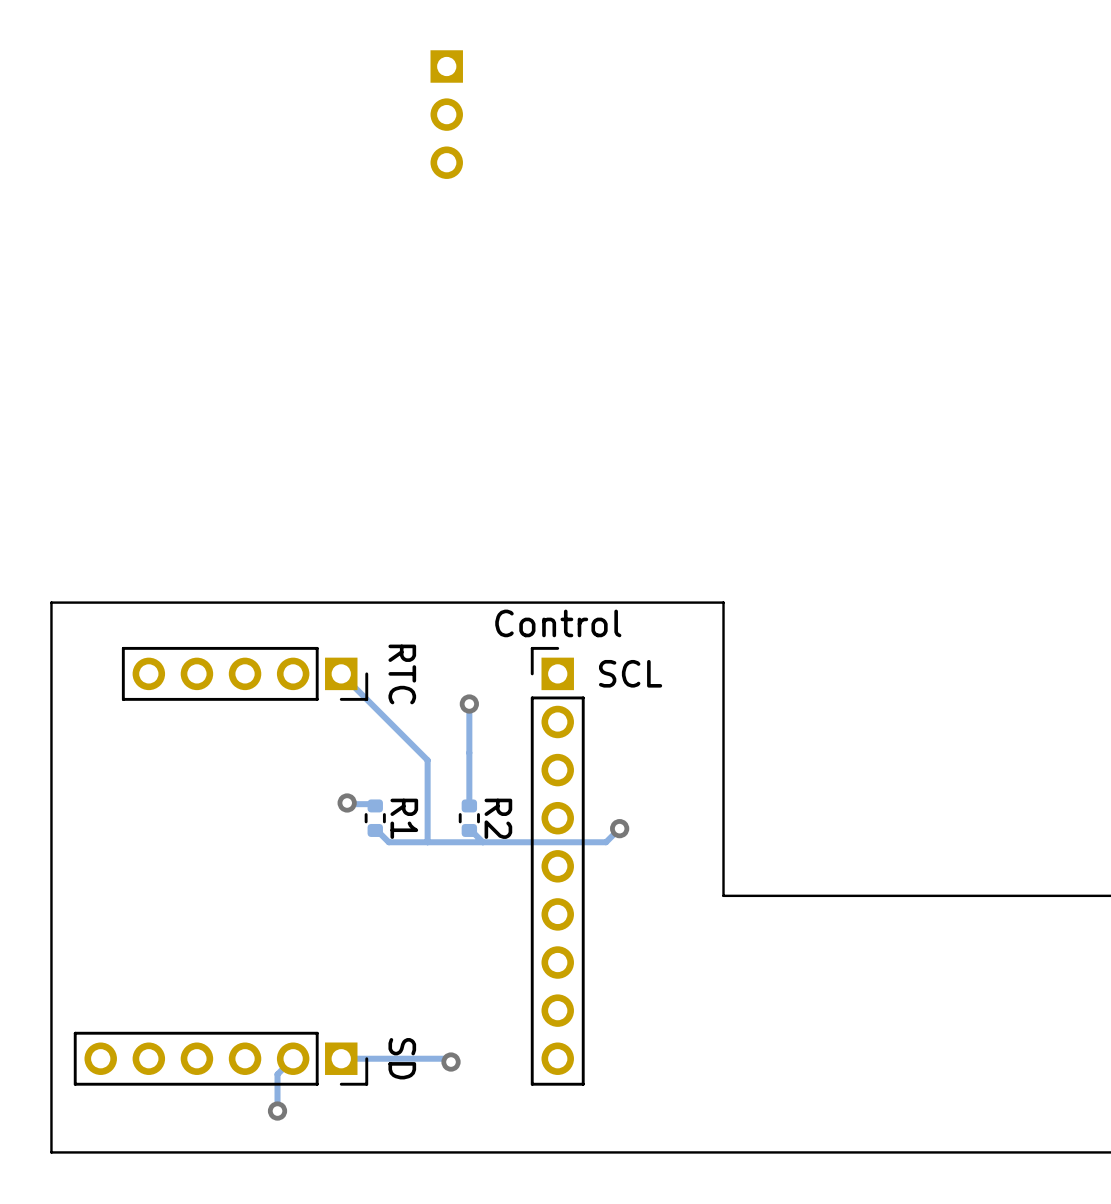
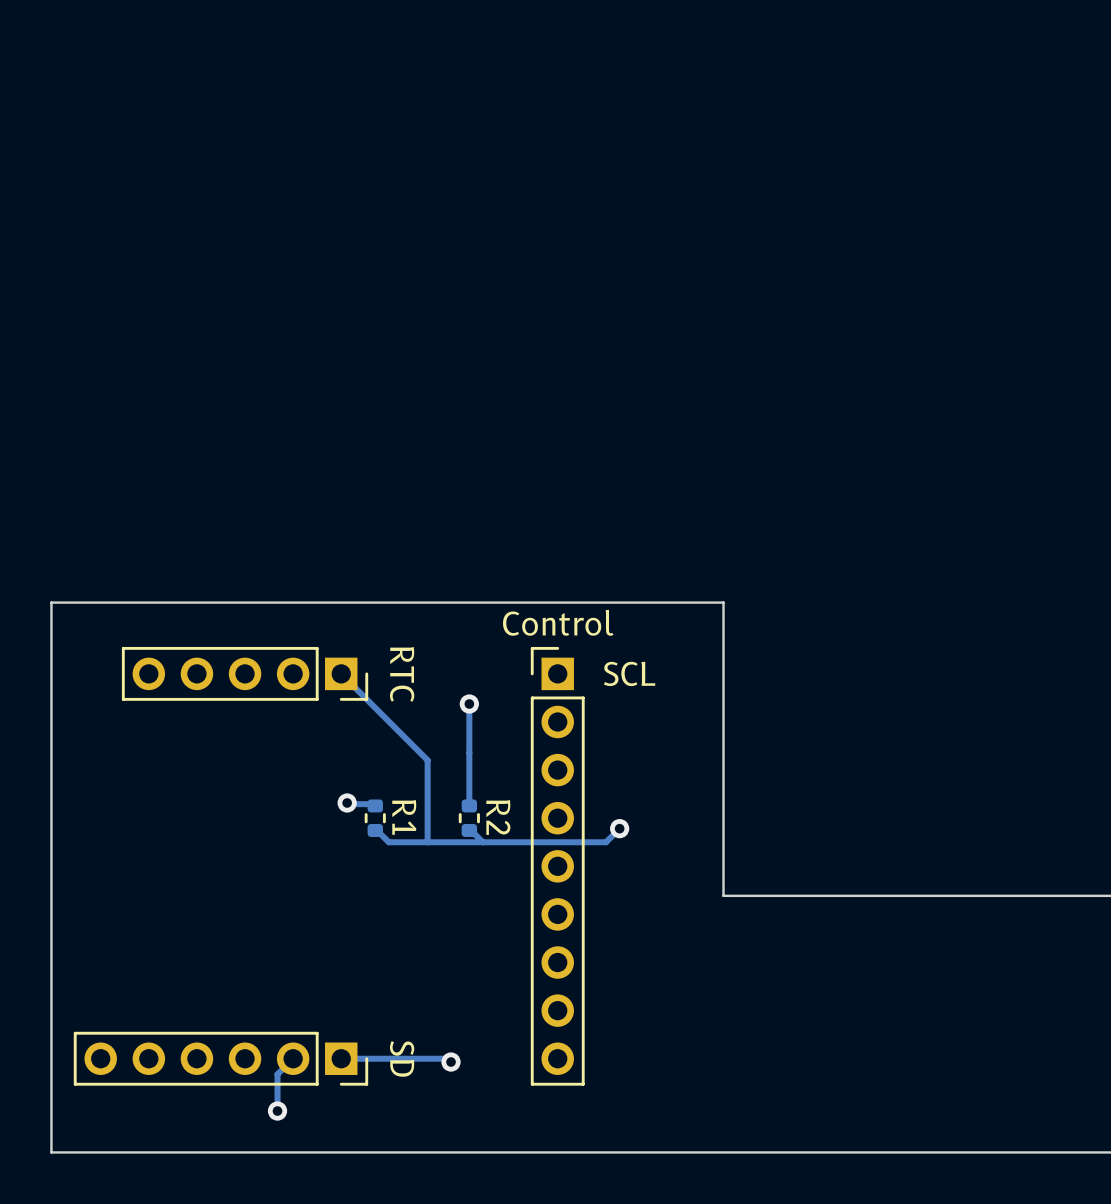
part: (446, 114) -> none

